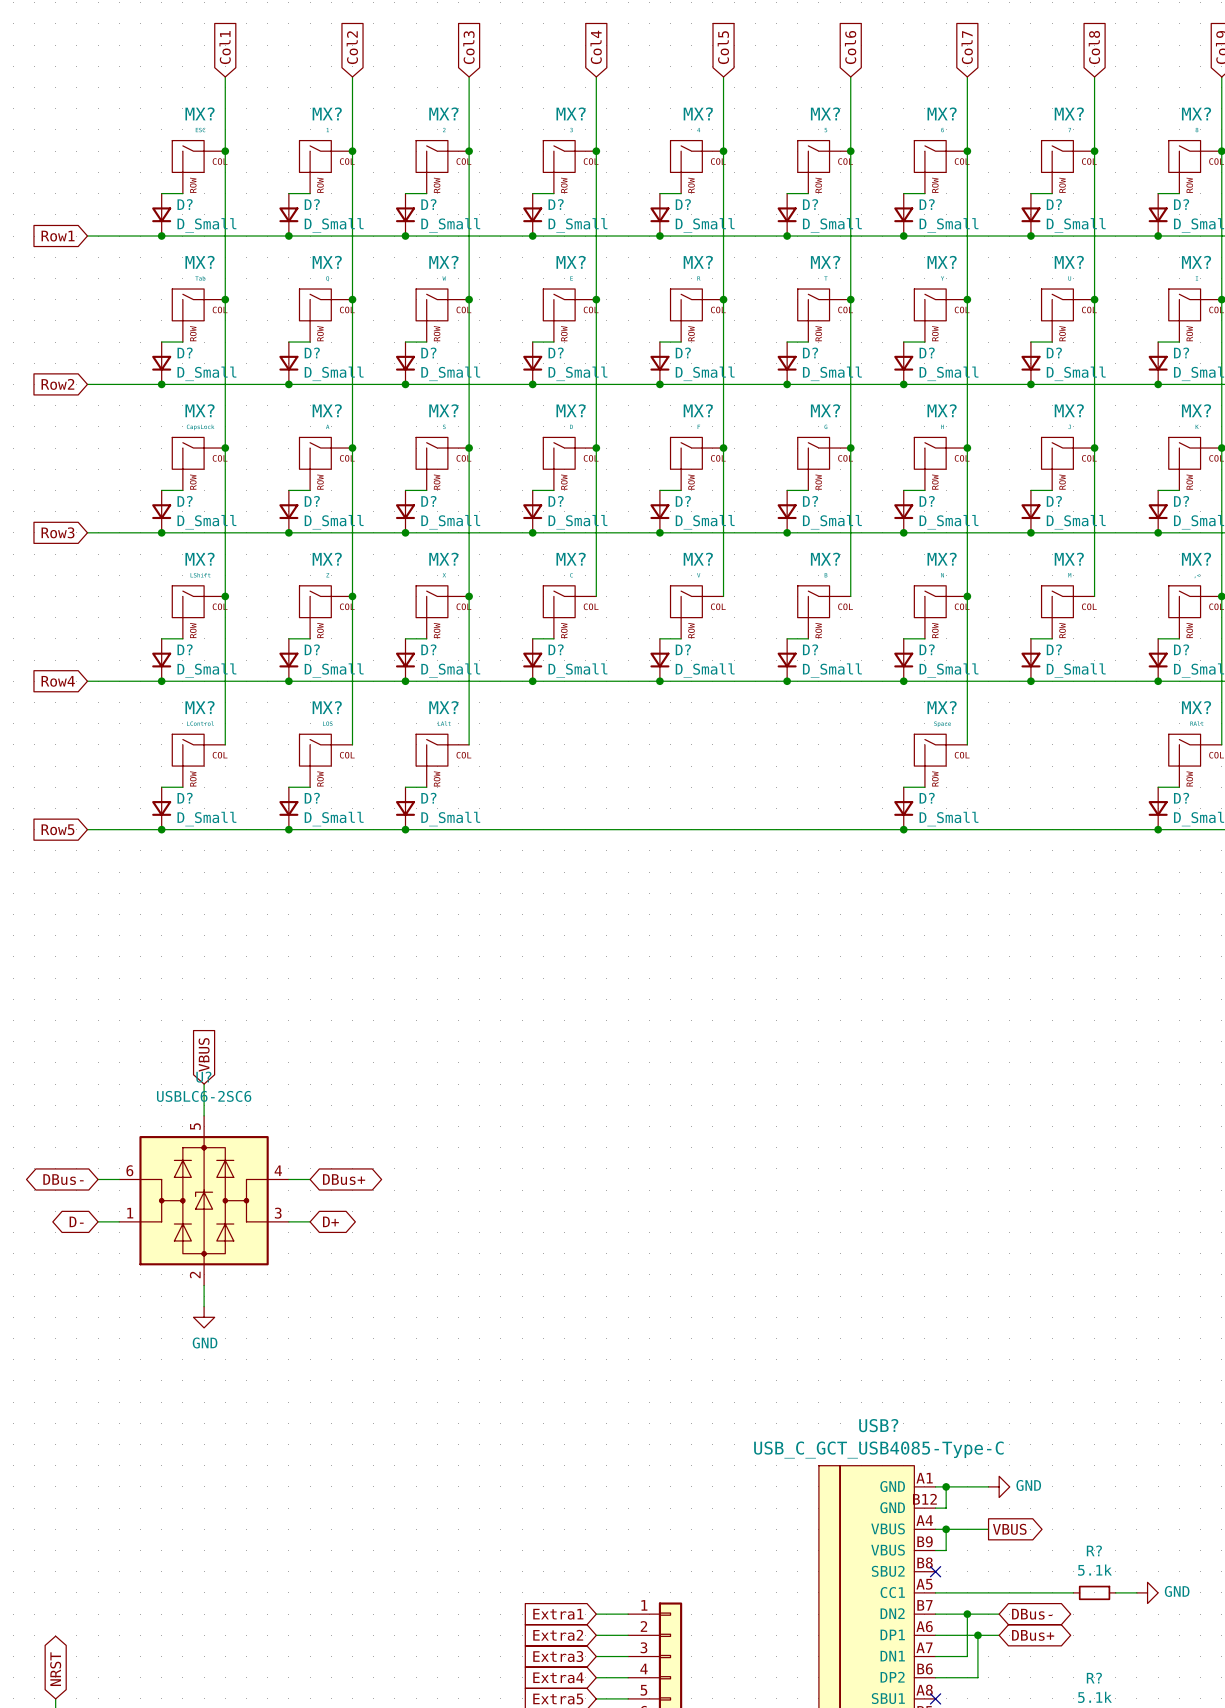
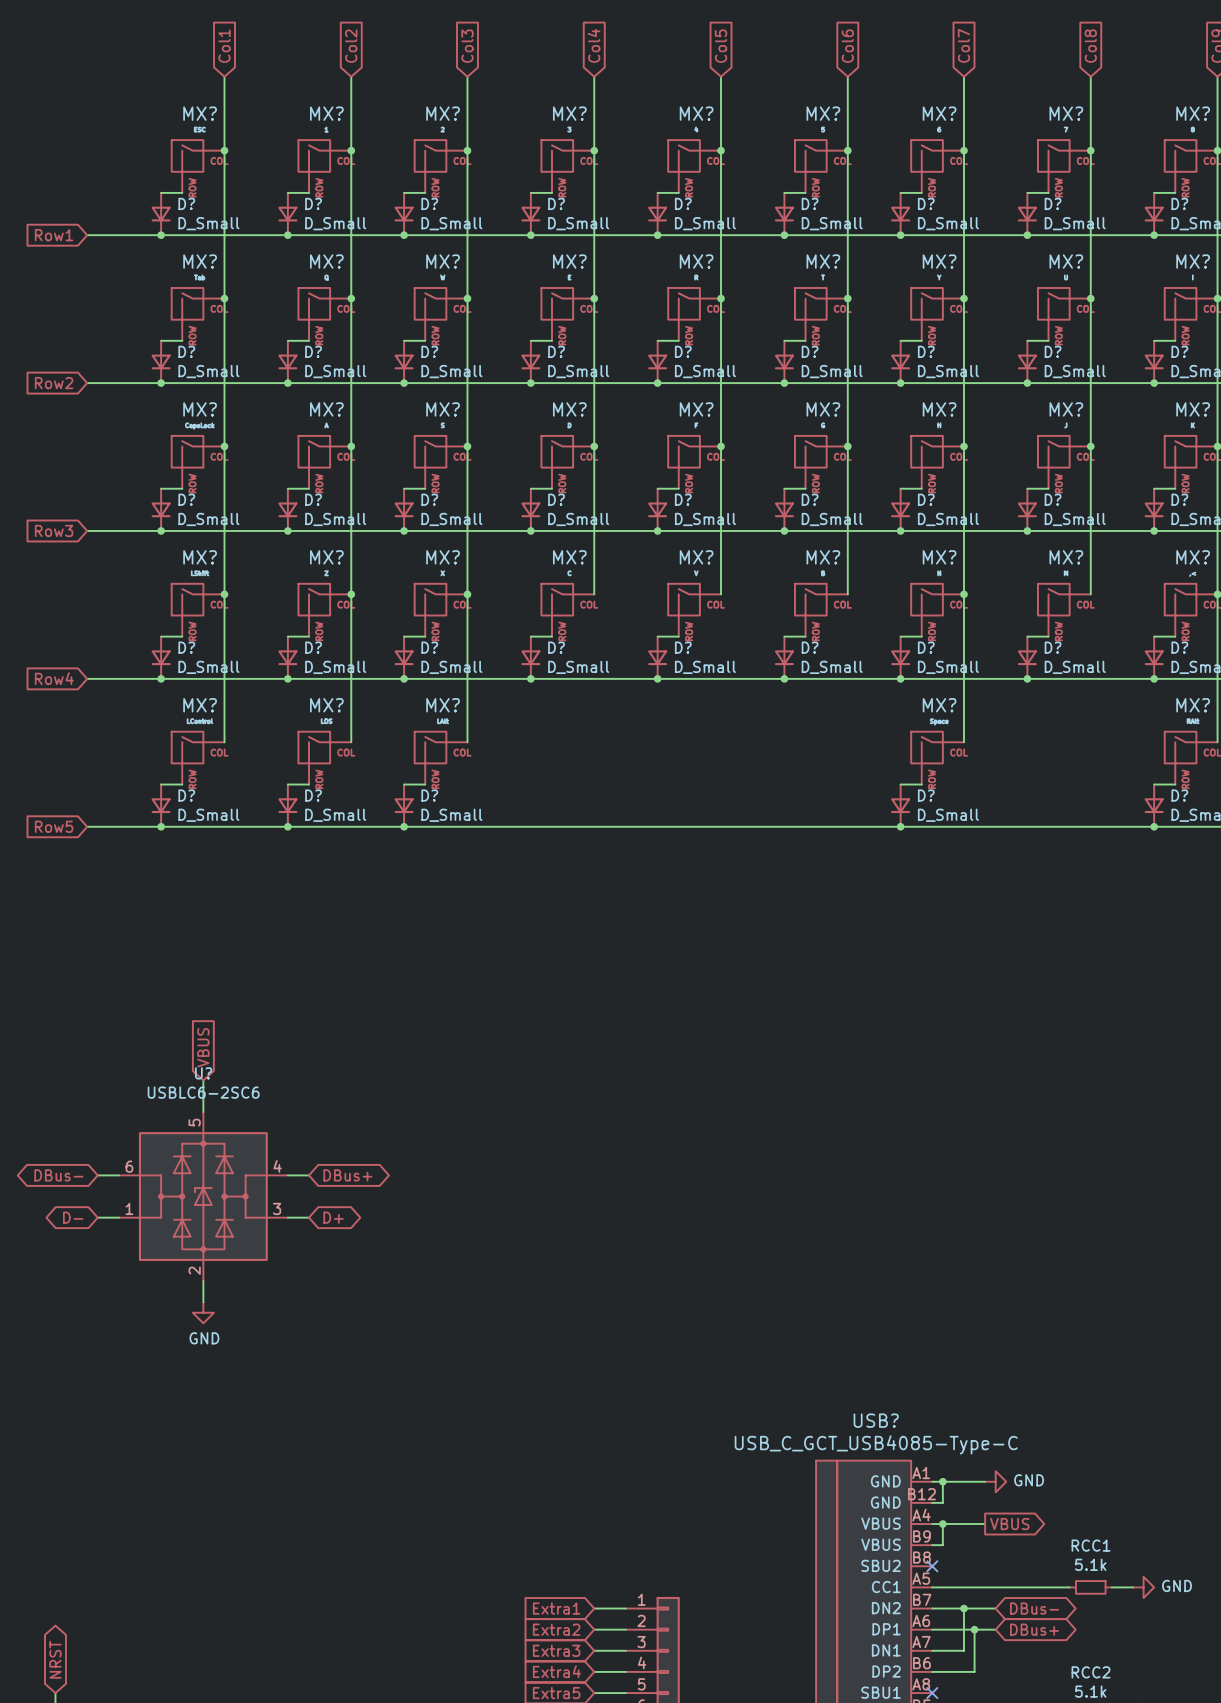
R? name: R? (1094, 1550) -> RCC1 (1091, 1545)
R? name: R? (1094, 1678) -> RCC2 (1091, 1672)

